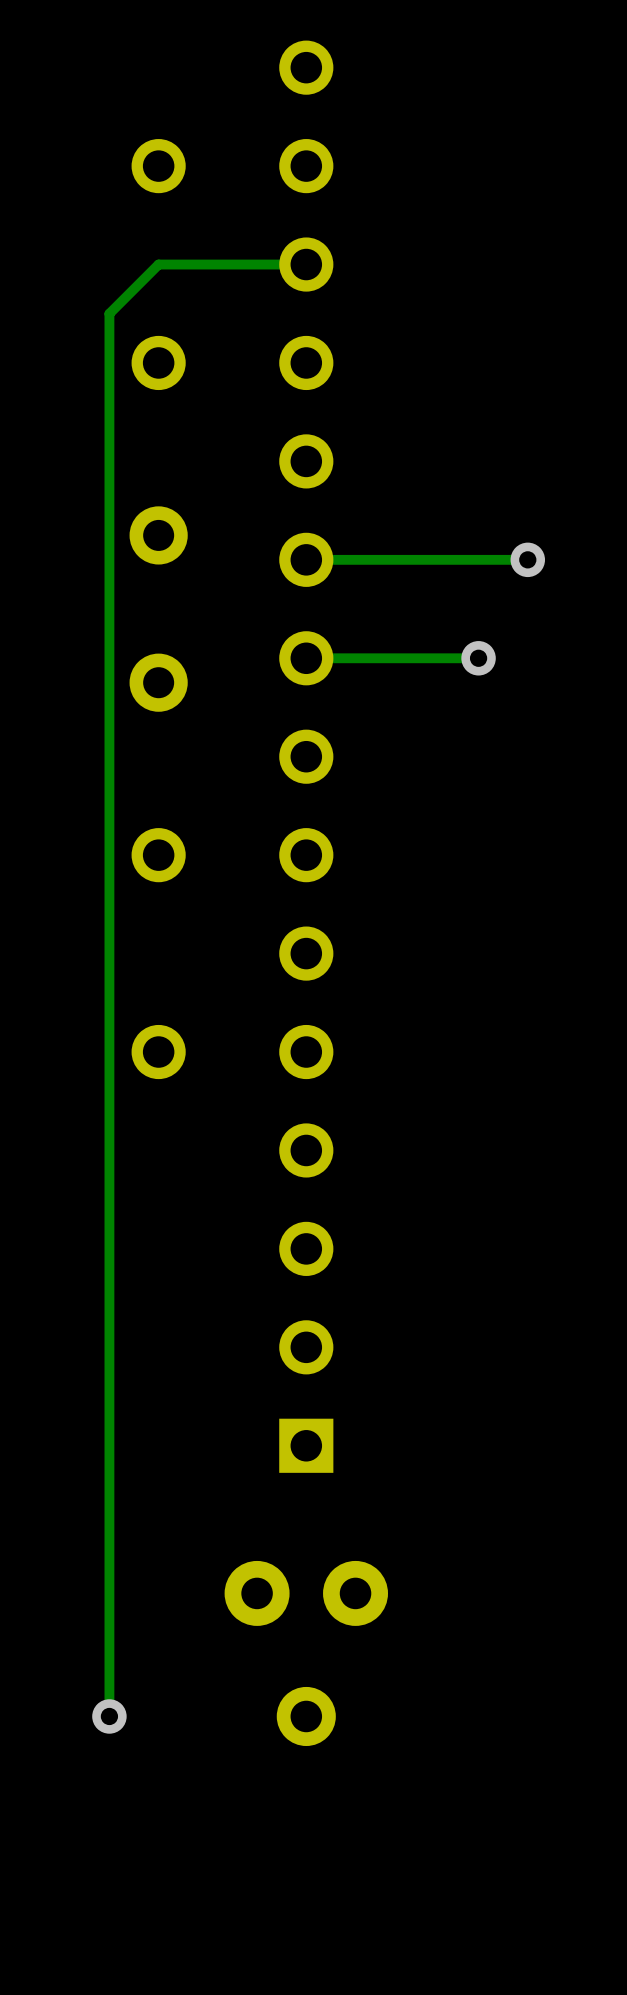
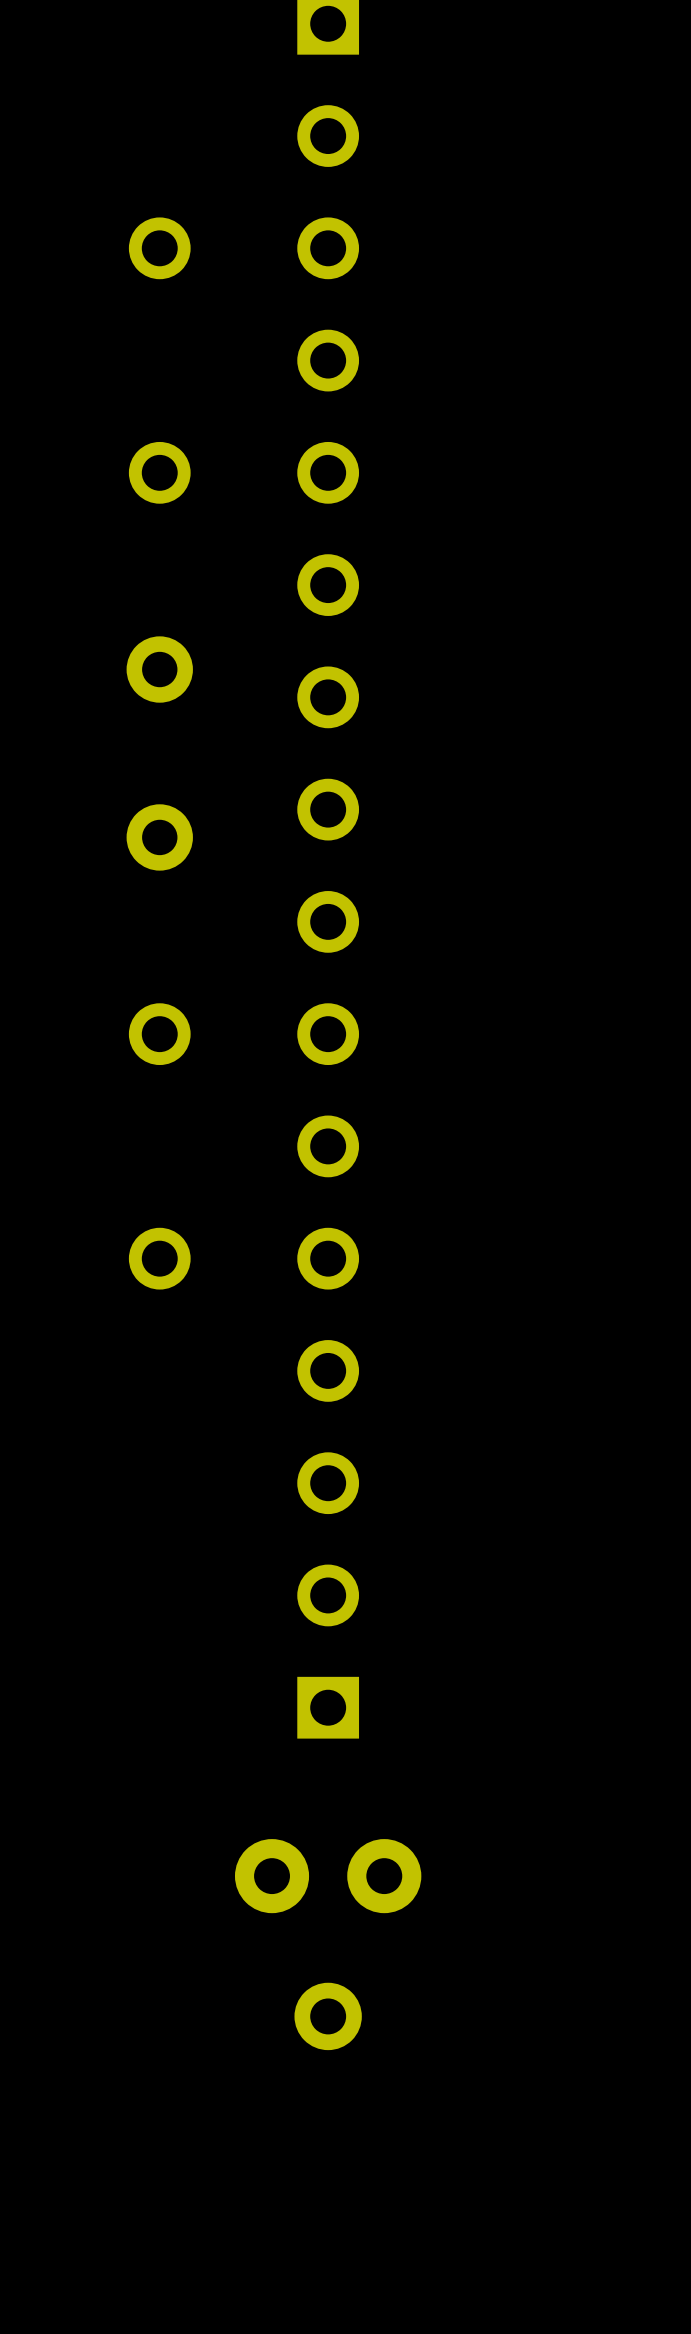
track: (306, 264) (158, 264) (109, 313) (109, 1716) -> none
track: (527, 559) (306, 559) -> none
via: (527, 559) -> none
track: (478, 658) (306, 658) -> none
via: (478, 658) -> none
via: (109, 1716) -> none

